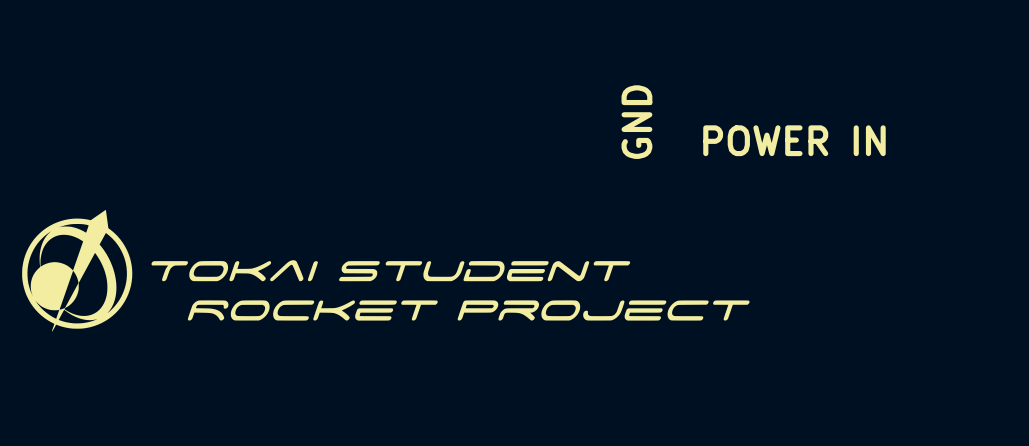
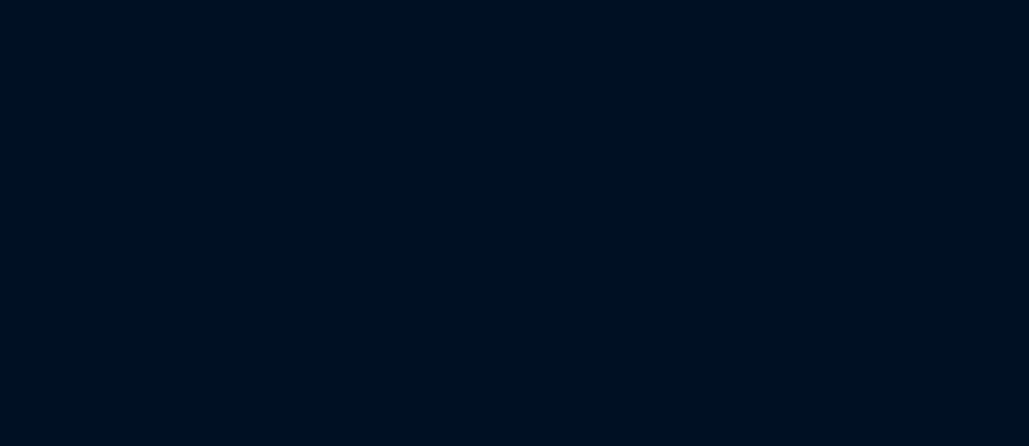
text: GND (636, 122) -> none
text: POWER IN (794, 140) -> none
drawing: [22, 209, 750, 332] -> none

